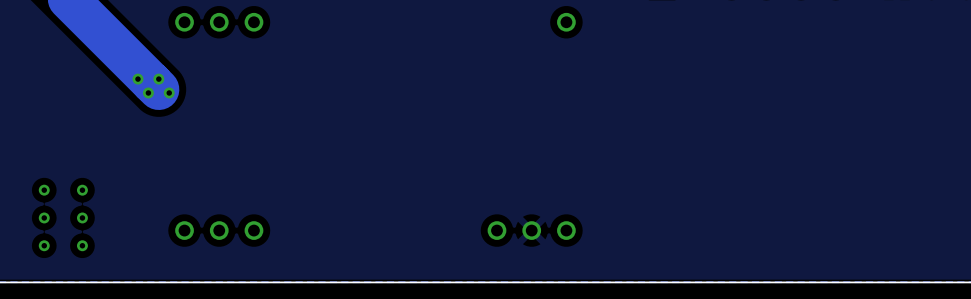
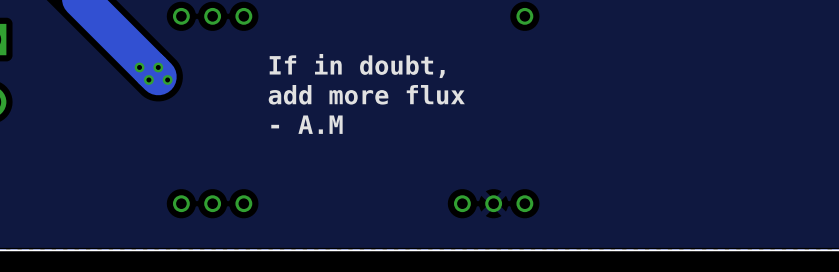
text: none -> If in doubt, (357, 66)
text: none -> add more flux (366, 94)
text: none -> - A.M (306, 124)
via: (44, 190) -> none
via: (82, 190) -> none
via: (44, 217) -> none
via: (82, 217) -> none
via: (44, 245) -> none
via: (82, 245) -> none

